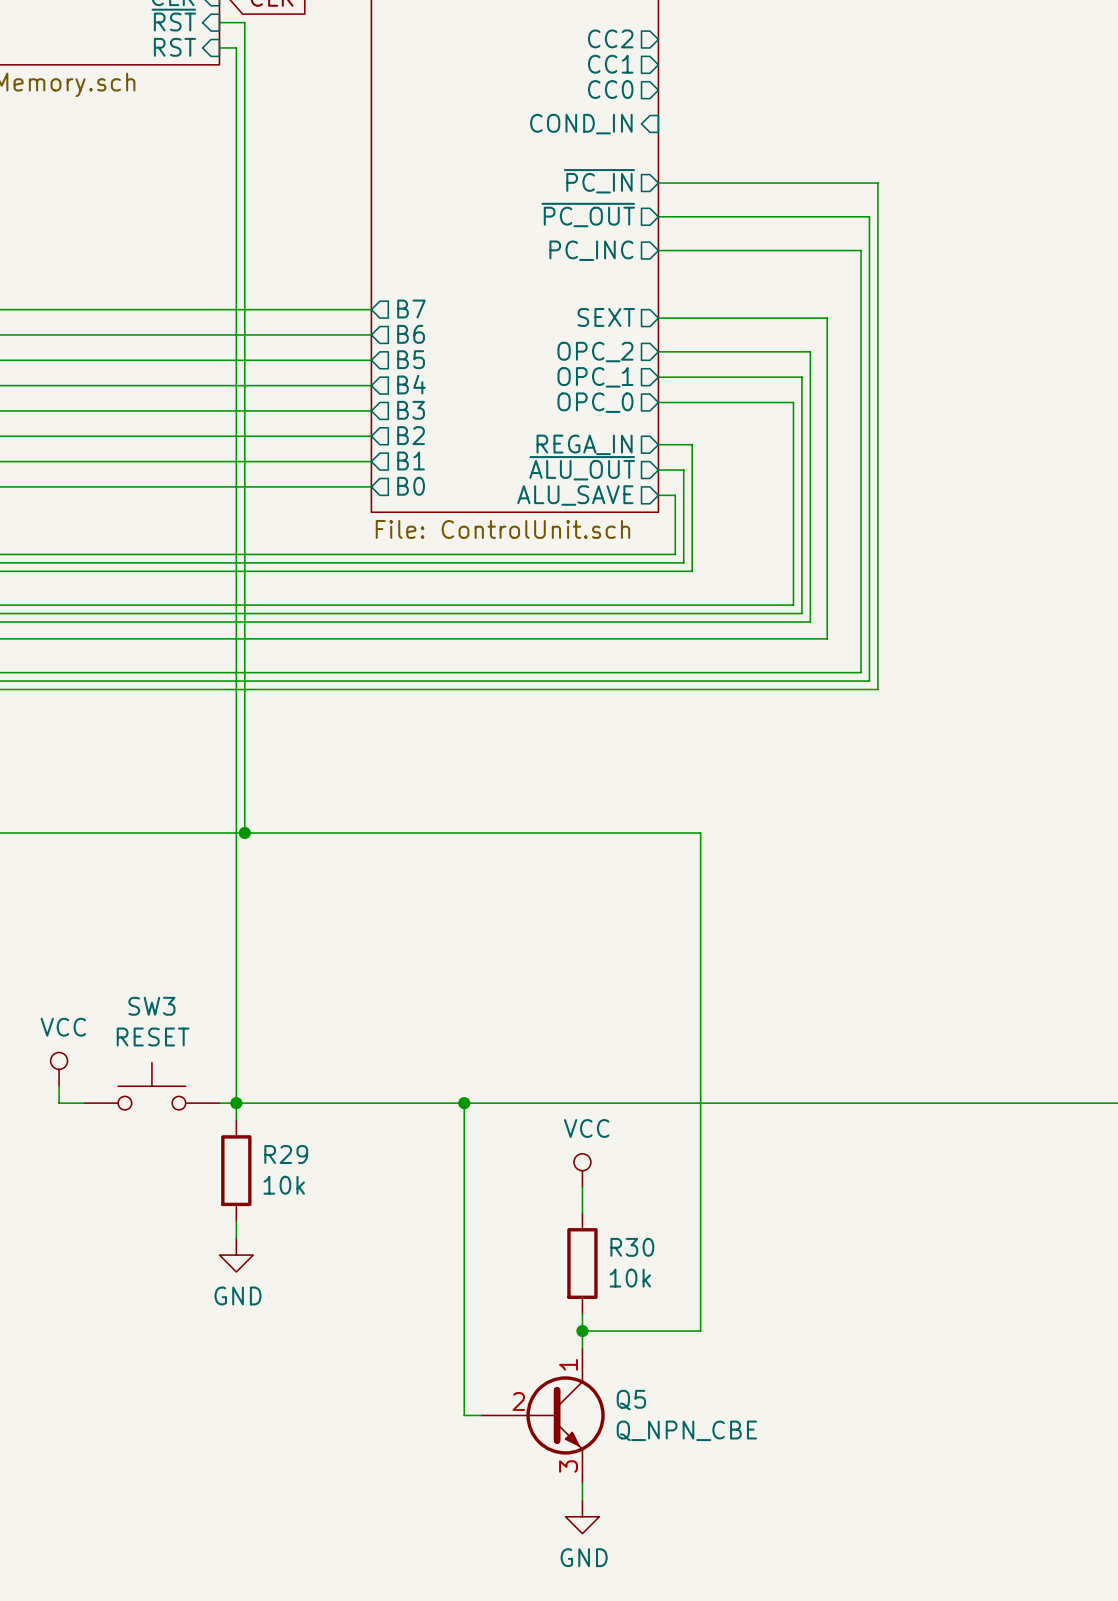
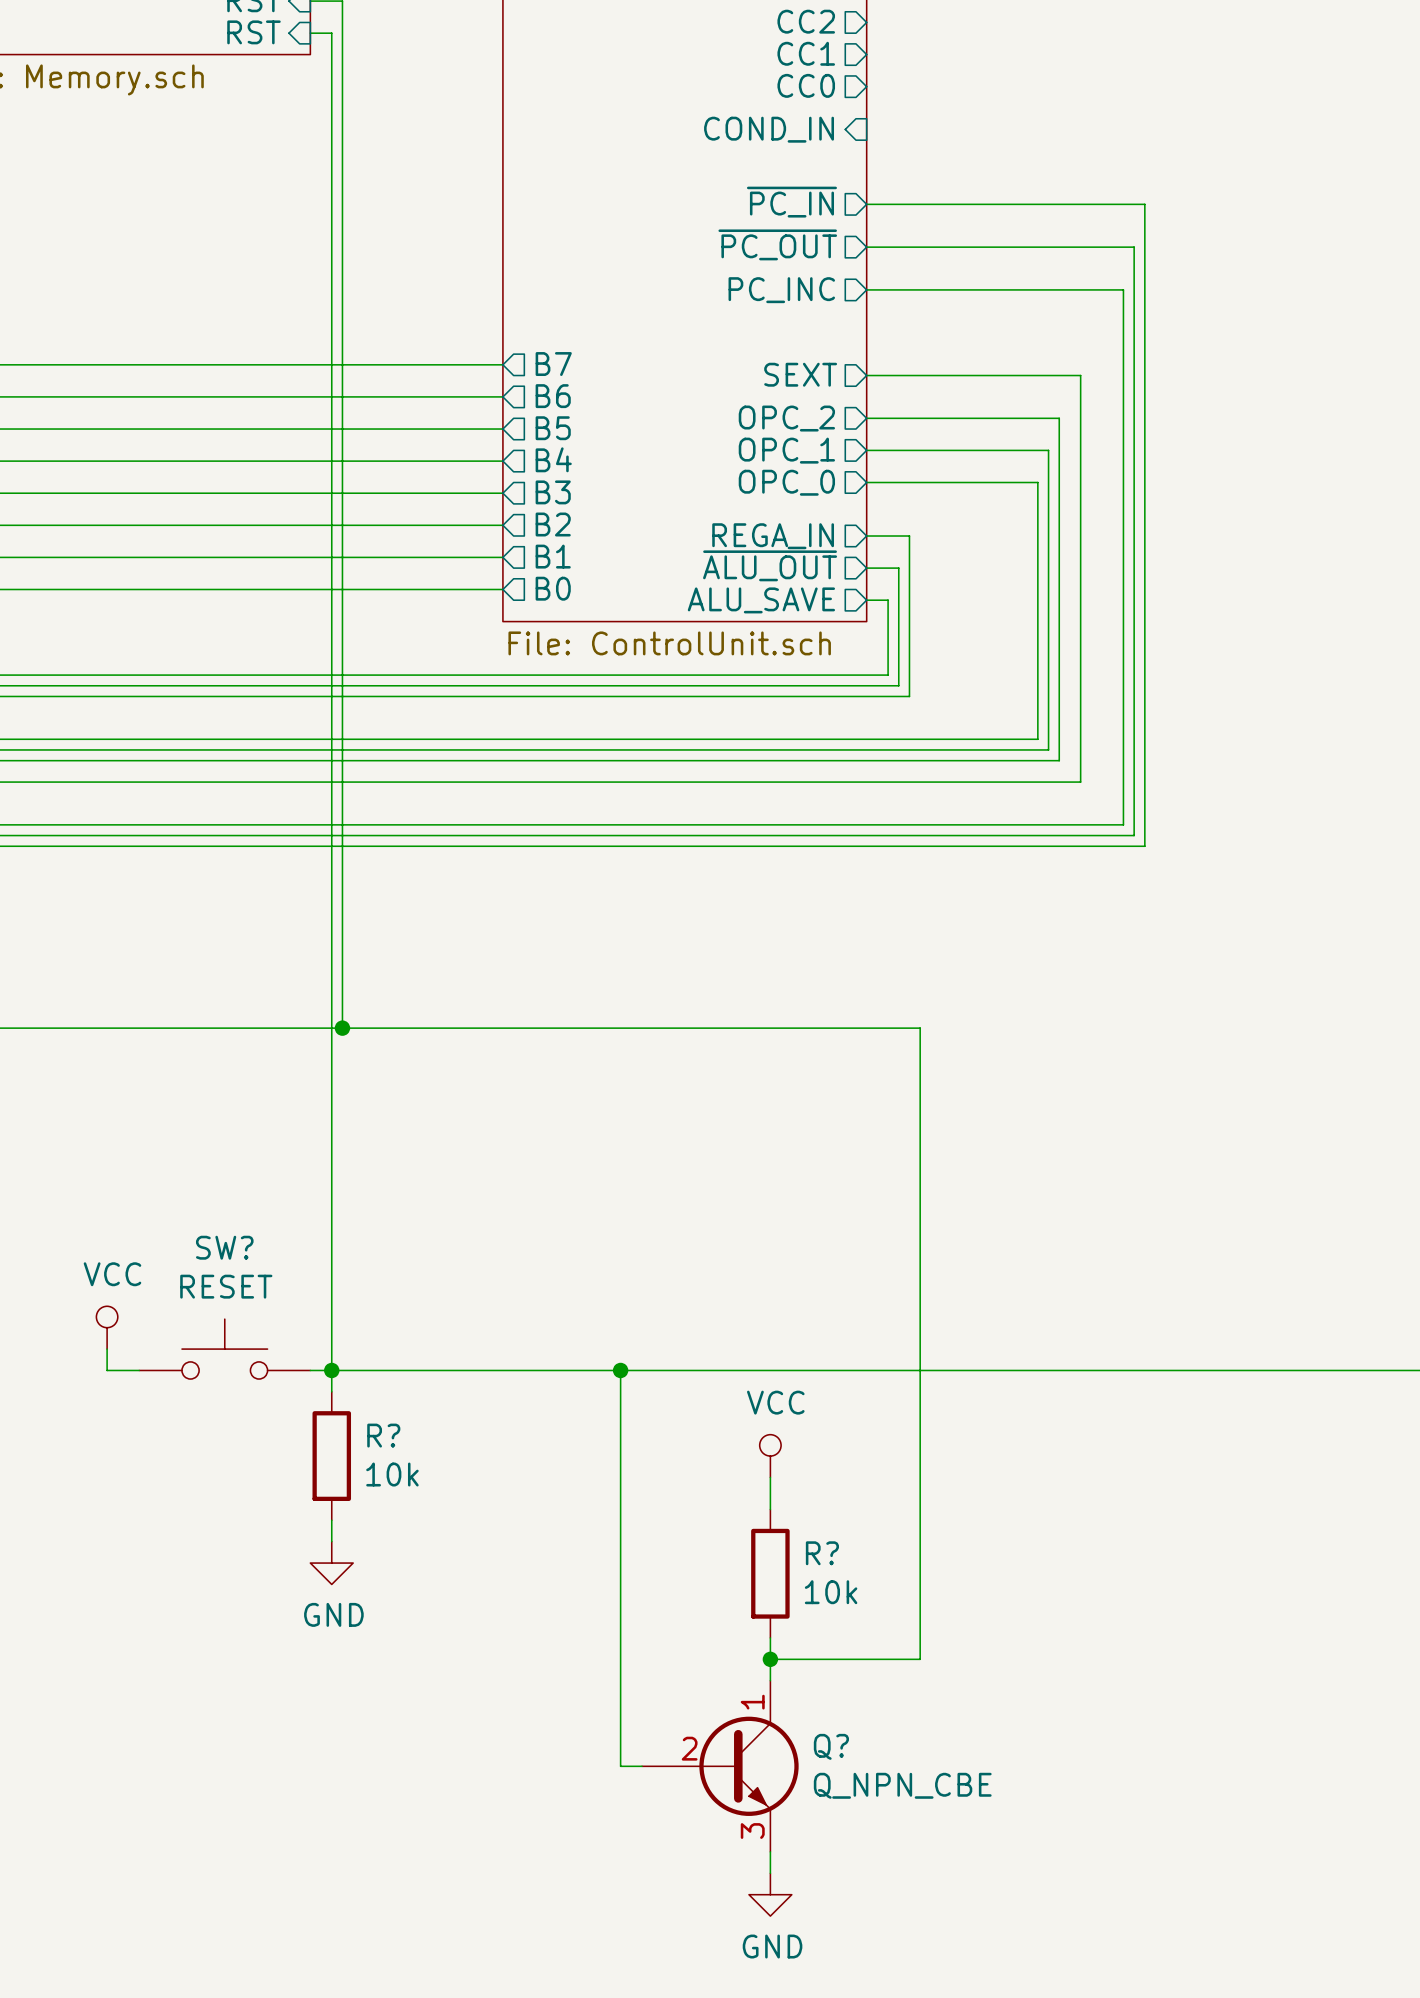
SW3 name: SW3 (151, 1006) -> SW? (224, 1247)
R29 name: R29 (286, 1154) -> R? (383, 1435)
R30 name: R30 (632, 1247) -> R? (822, 1553)
Q5 name: Q5 (631, 1400) -> Q? (831, 1746)

